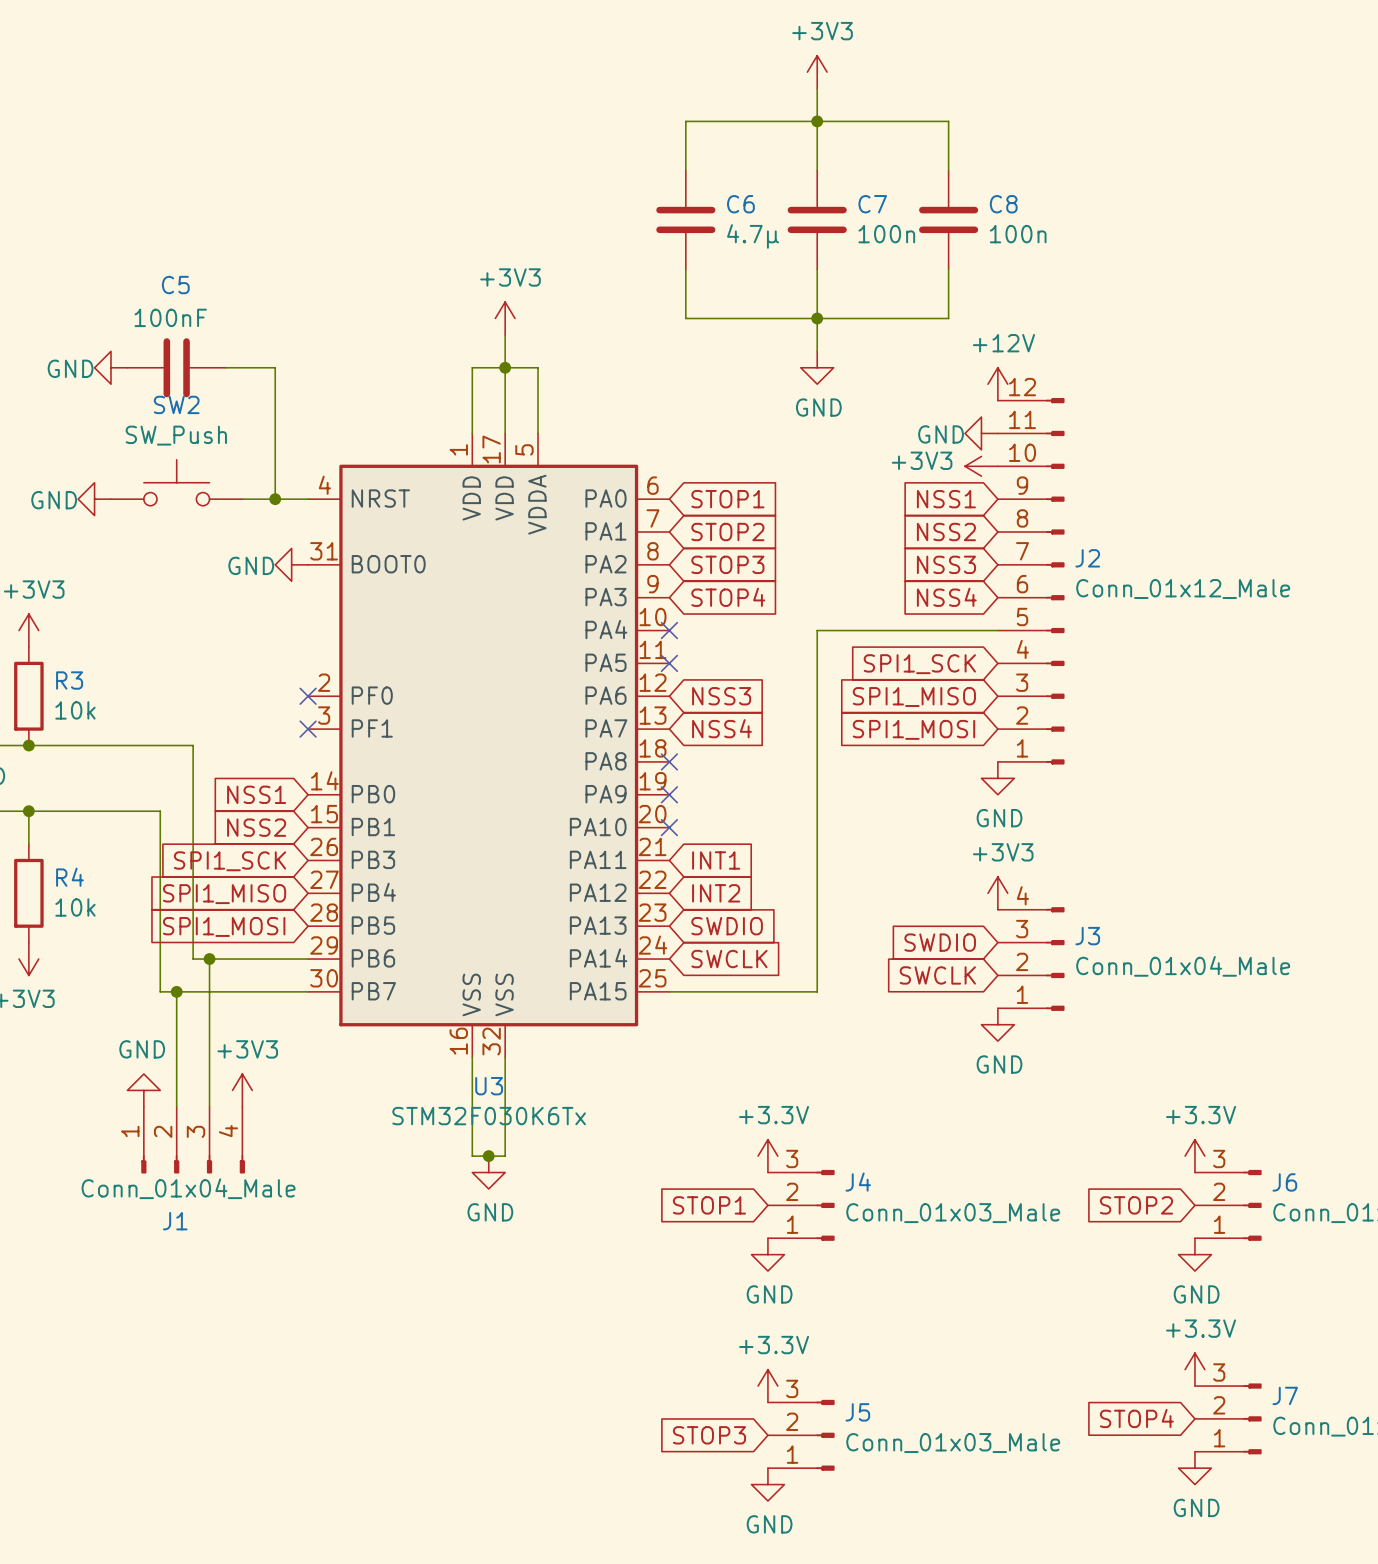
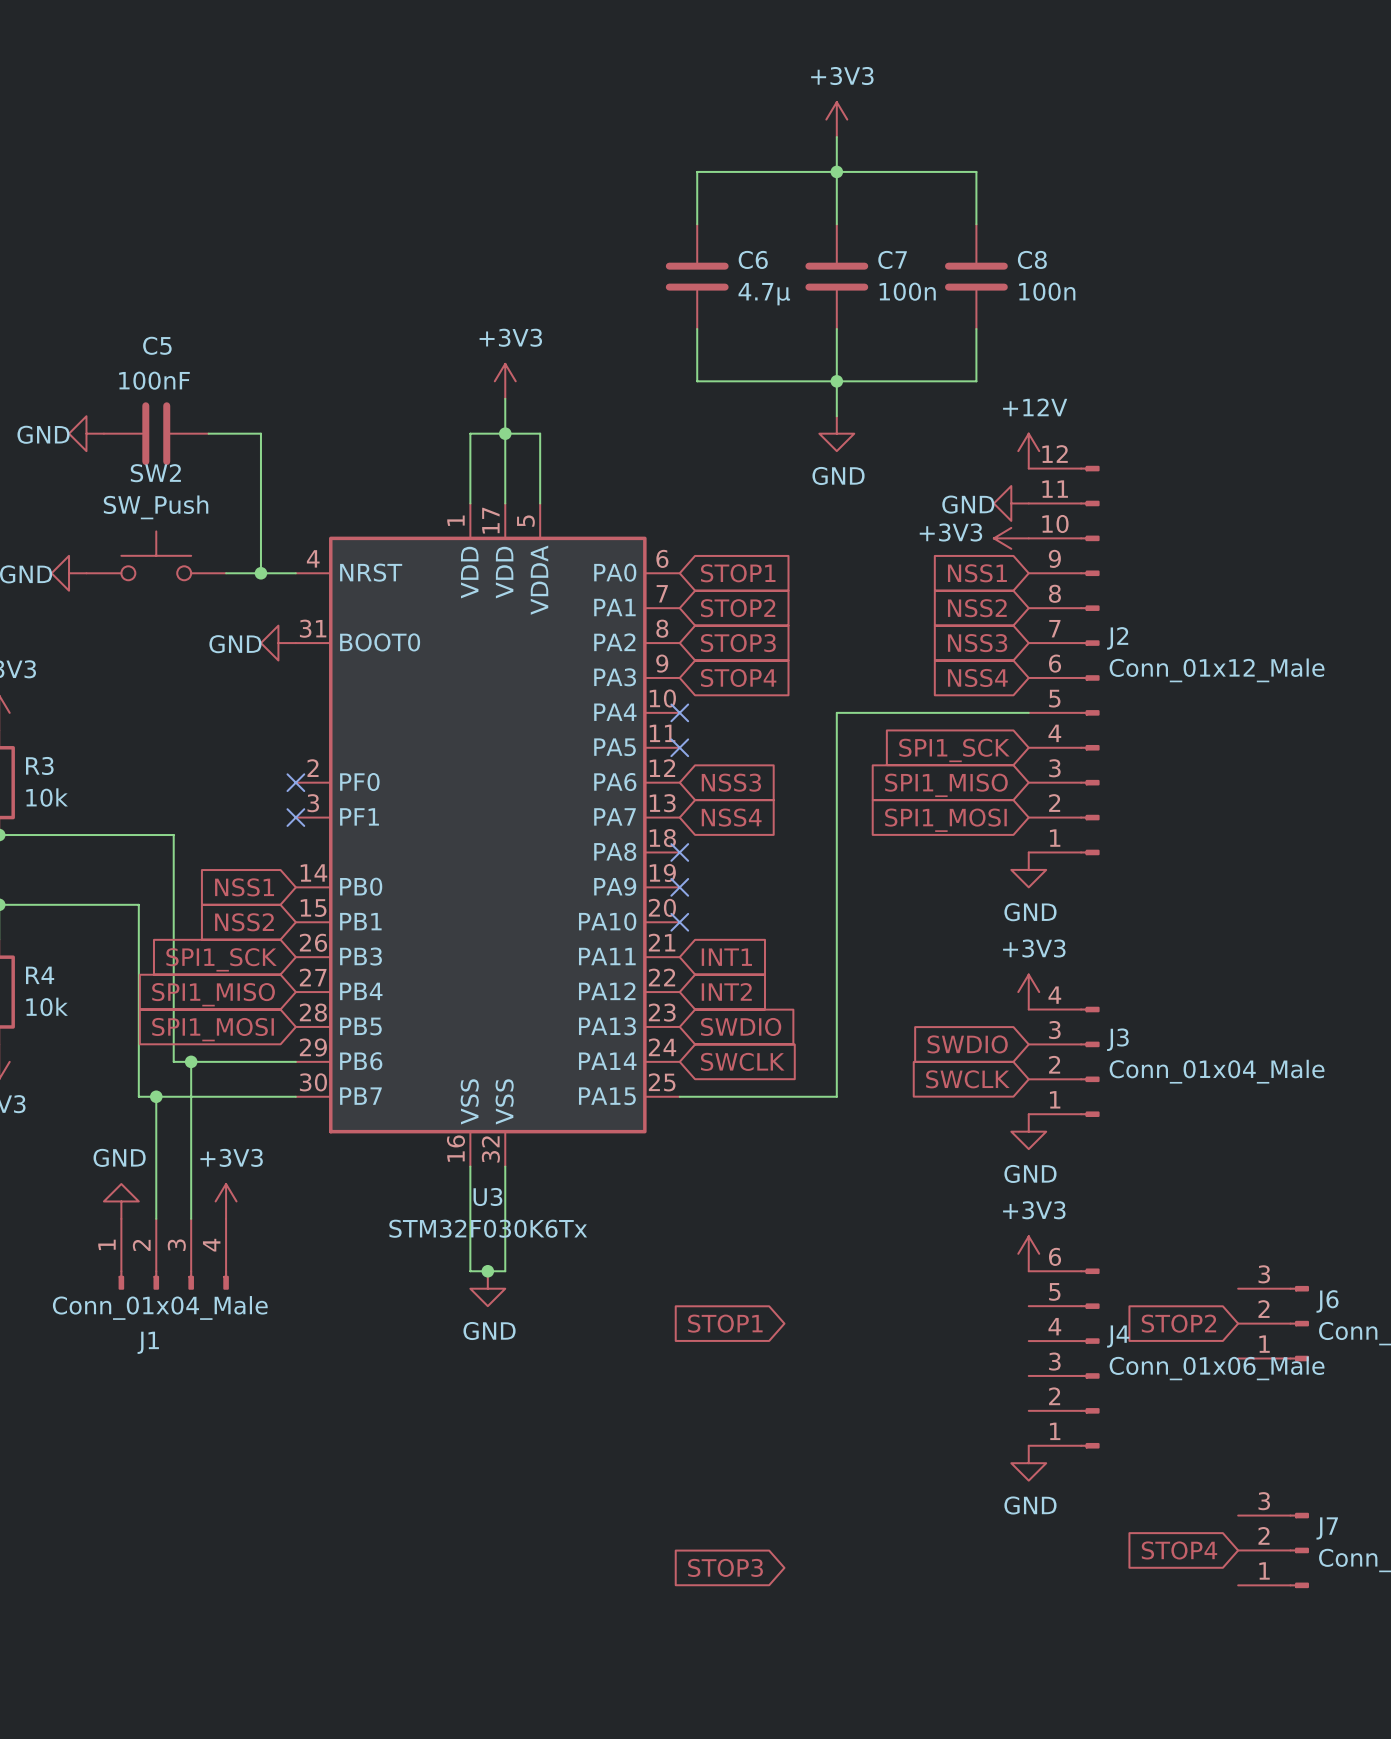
power symbol: none -> +3V3 (1028, 1253)
power symbol: +3.3V (767, 1156) -> none
power symbol: +3.3V (1194, 1156) -> none
J4 symbol: [767, 1169, 835, 1241] -> [1028, 1268, 1100, 1449]
J4 value: Conn_01x03_Male (953, 1213) -> Conn_01x06_Male (1217, 1368)
power symbol: GND (767, 1254) -> none
power symbol: GND (1194, 1254) -> none
power symbol: none -> GND (1028, 1463)
power symbol: +3.3V (1194, 1369) -> none
power symbol: +3.3V (767, 1386) -> none
J5: Conn_01x03_Male (801, 1435) -> none
power symbol: GND (1194, 1468) -> none
power symbol: GND (767, 1484) -> none

